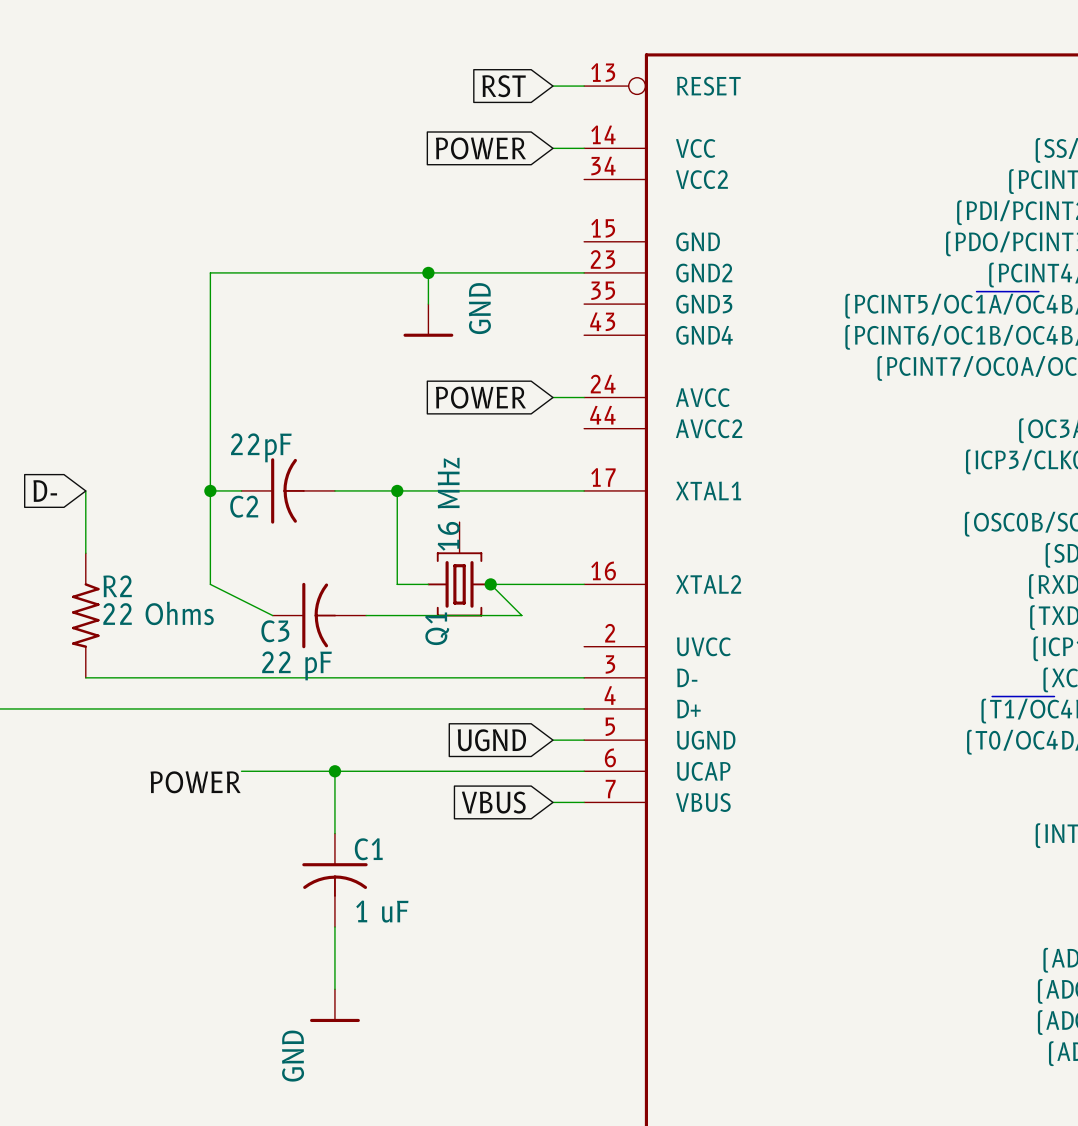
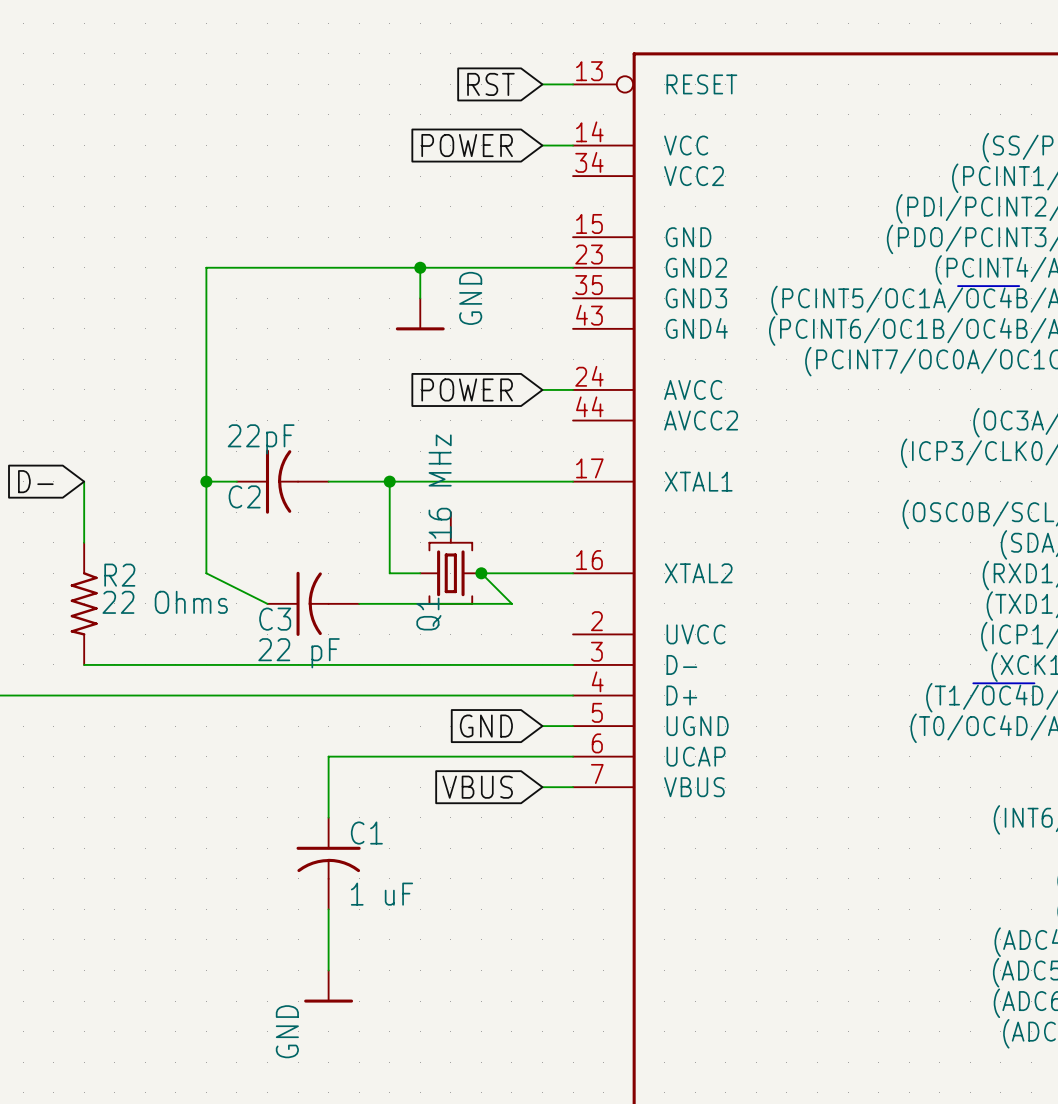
global label: UGND (491, 740) -> GND (486, 726)
wire: (241, 771) (334, 771) -> none
junction: (334, 771) -> none
label: POWER (195, 782) -> none

